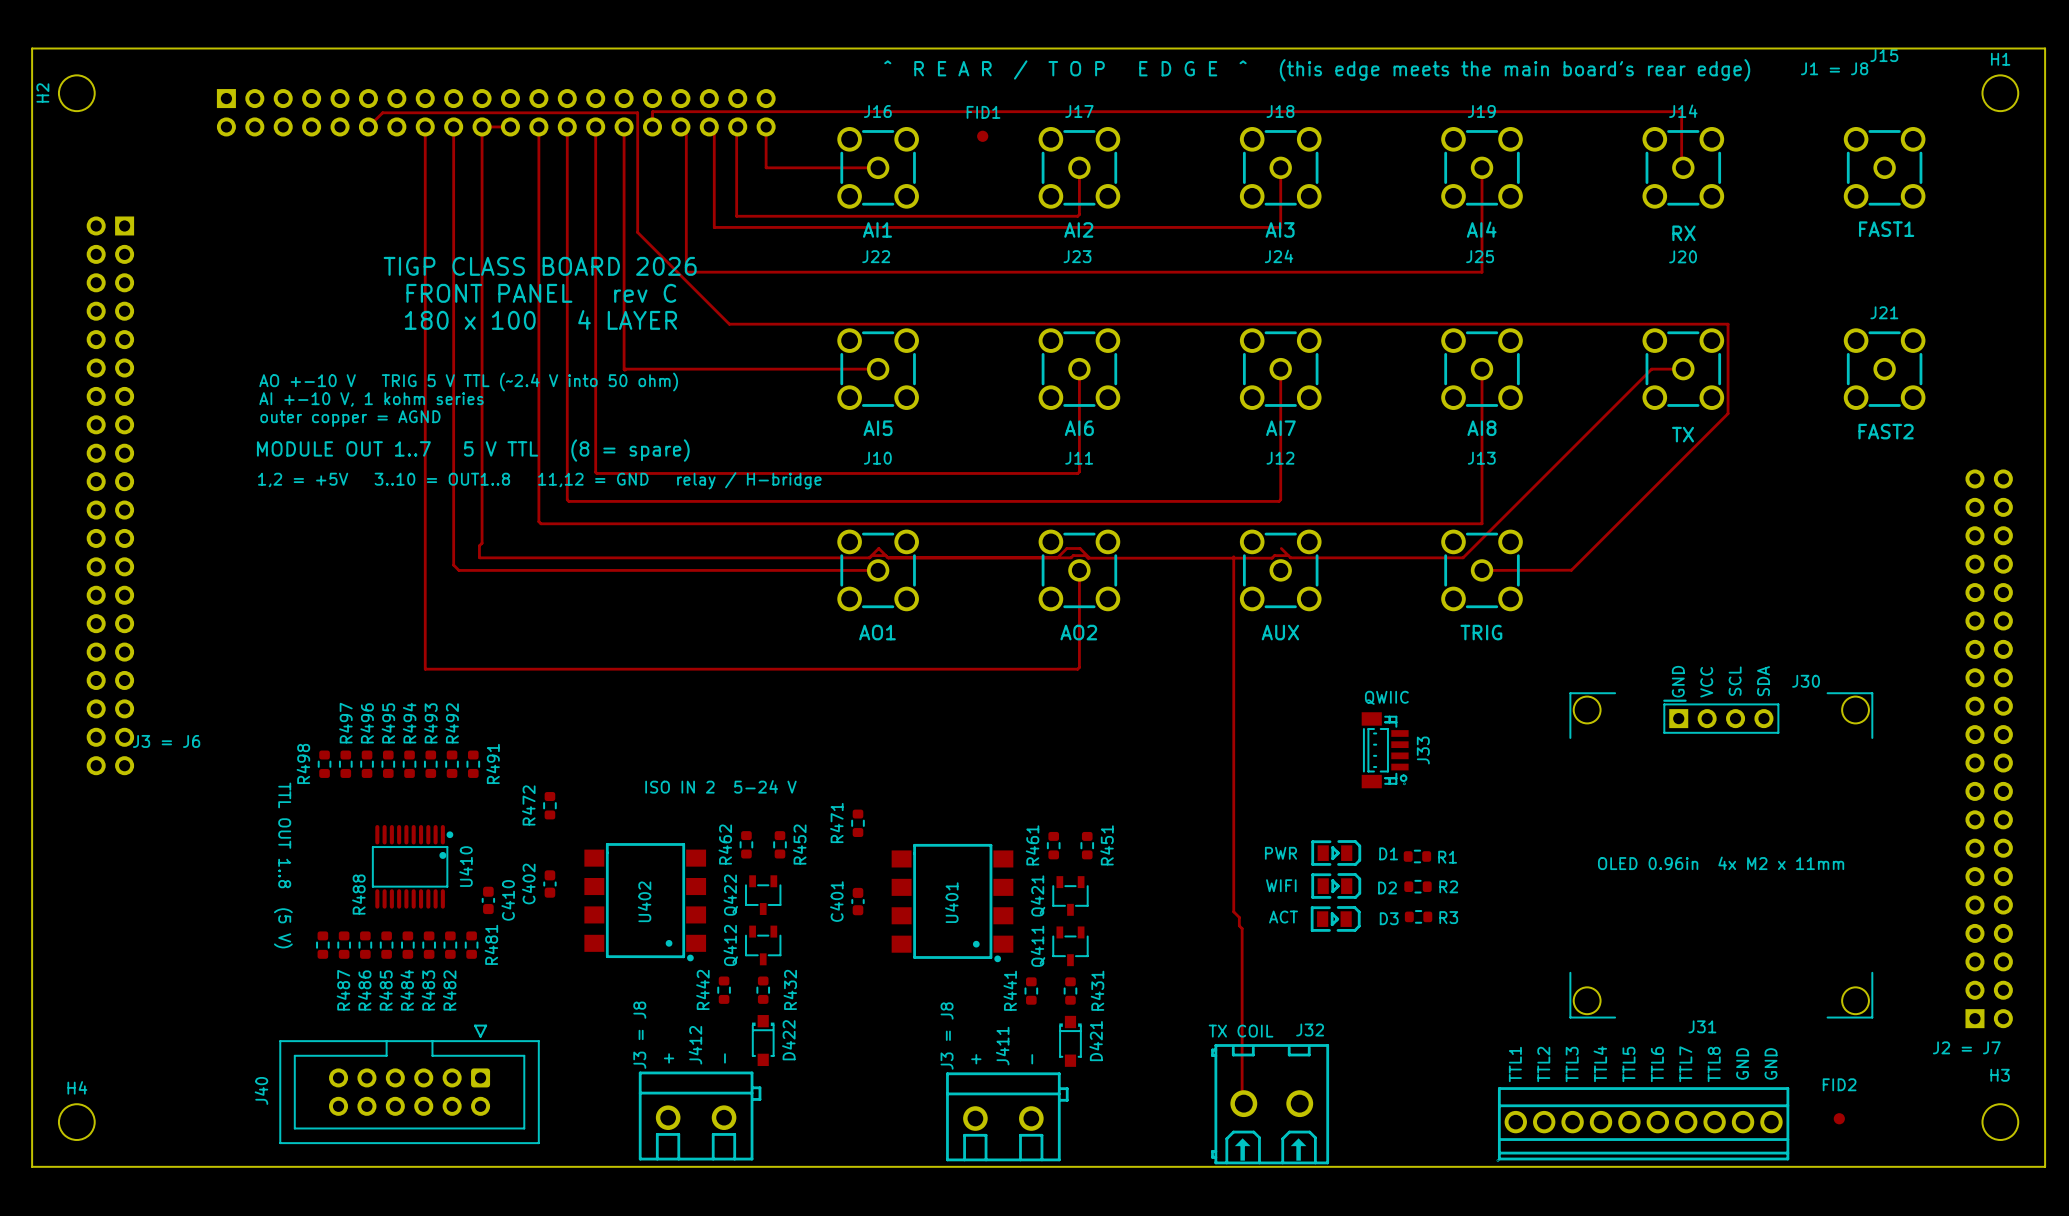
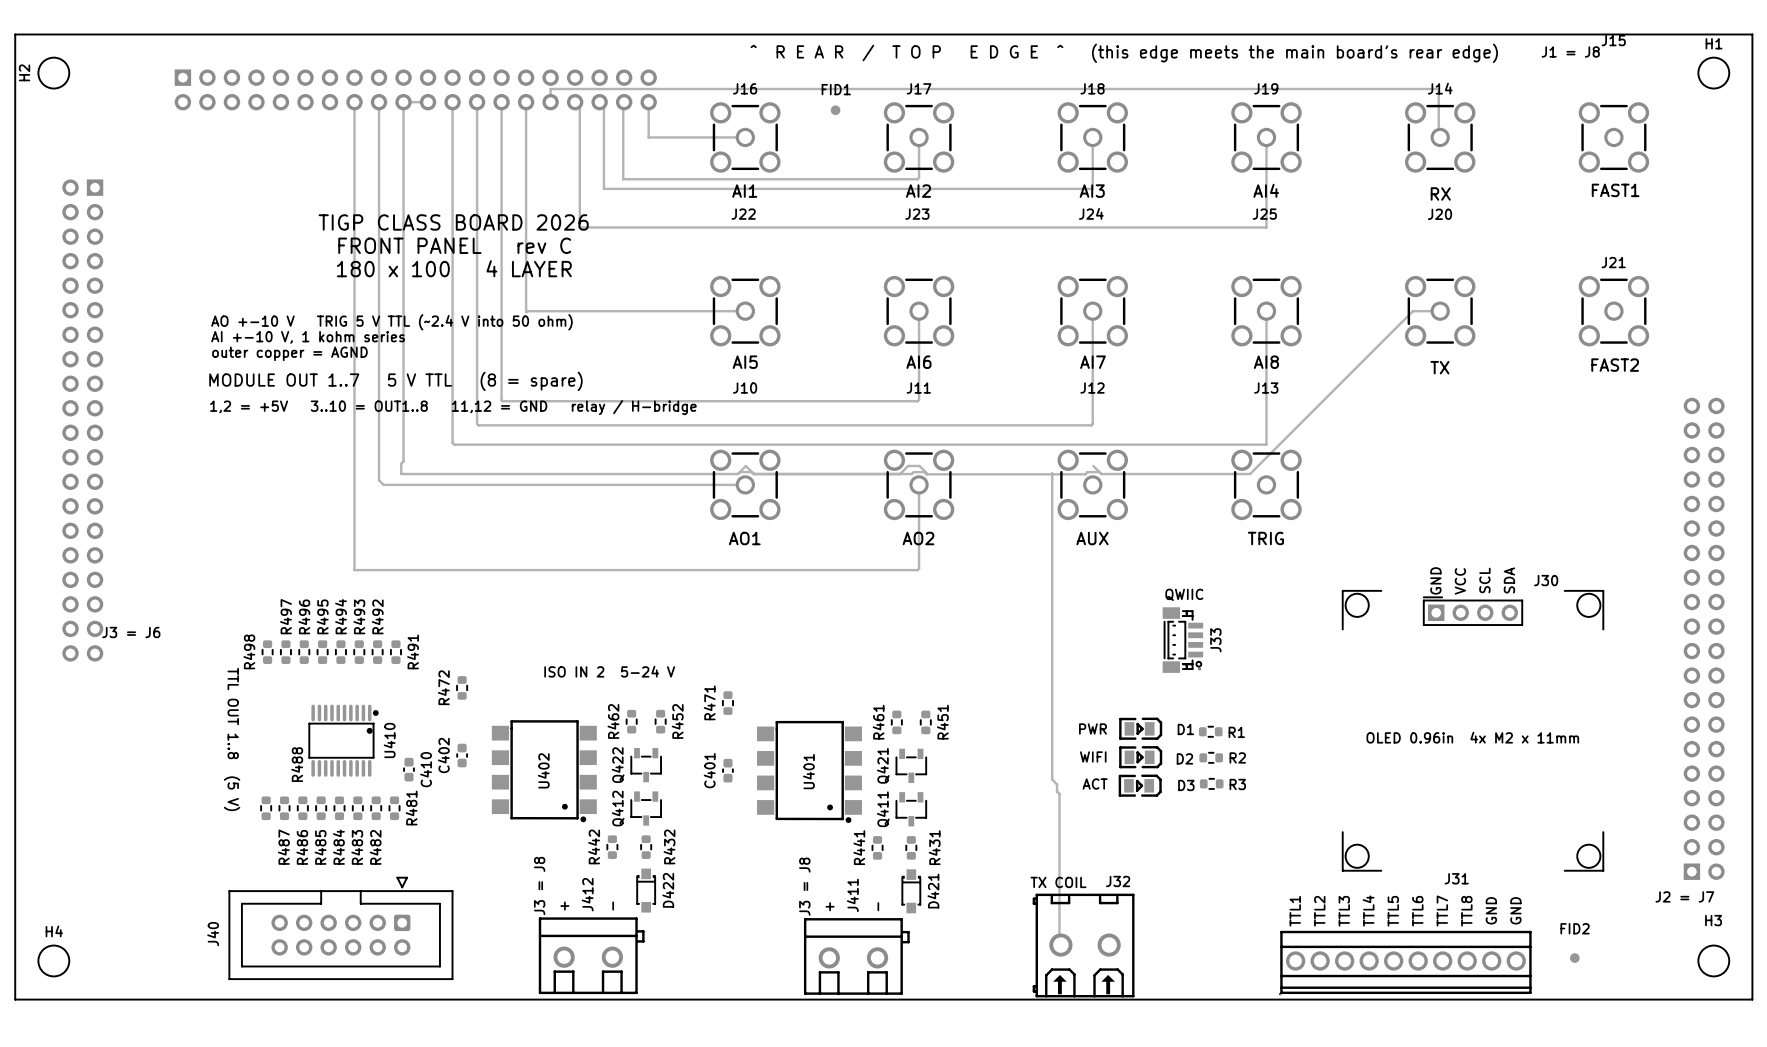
track: (368, 126) (382, 112) (637, 112) (637, 232) (729, 324) (1728, 324) (1728, 413) (1571, 570) (1482, 570) -> none

